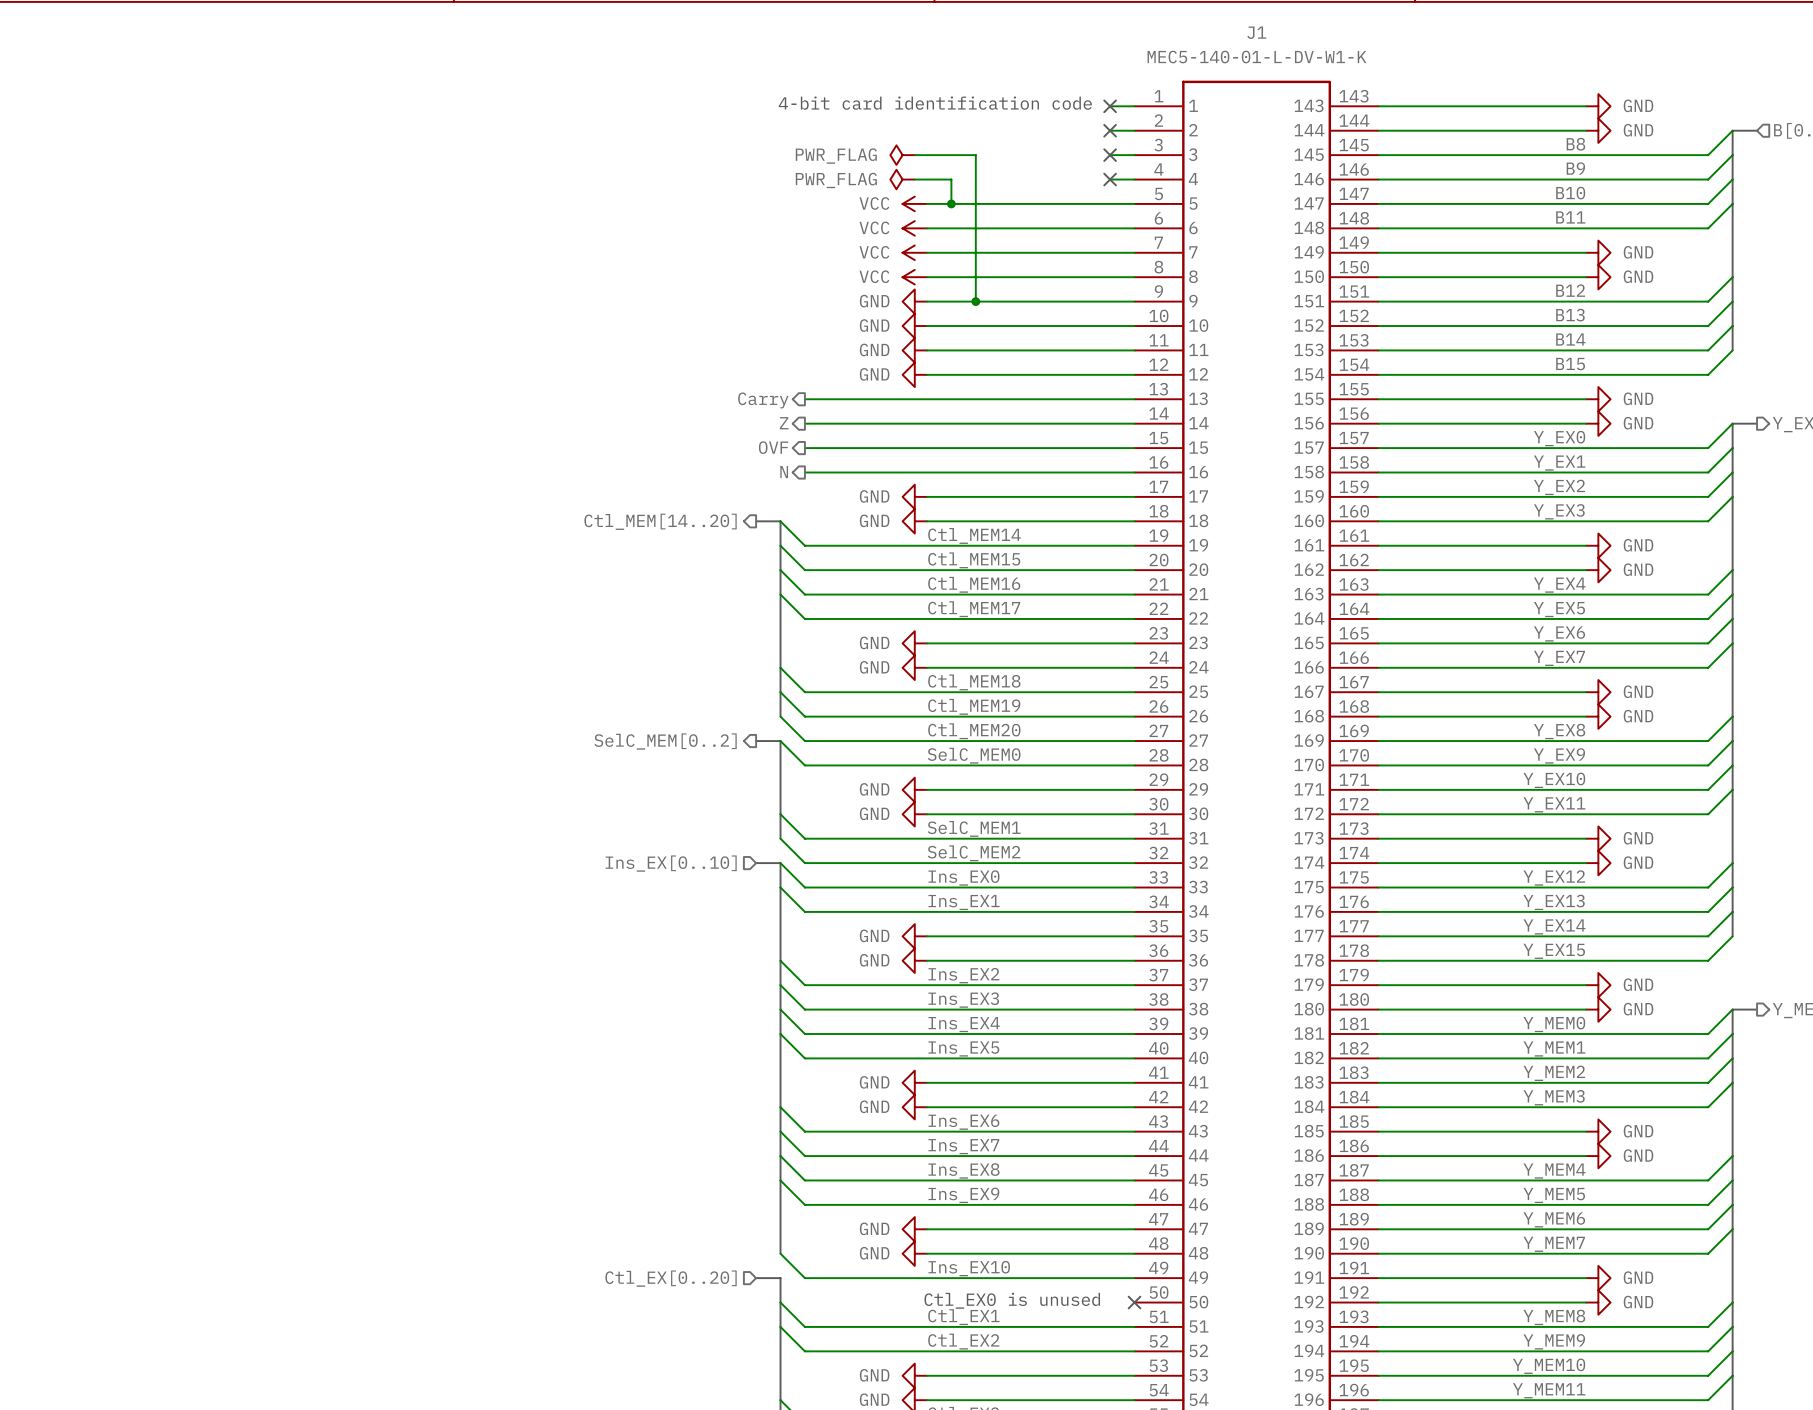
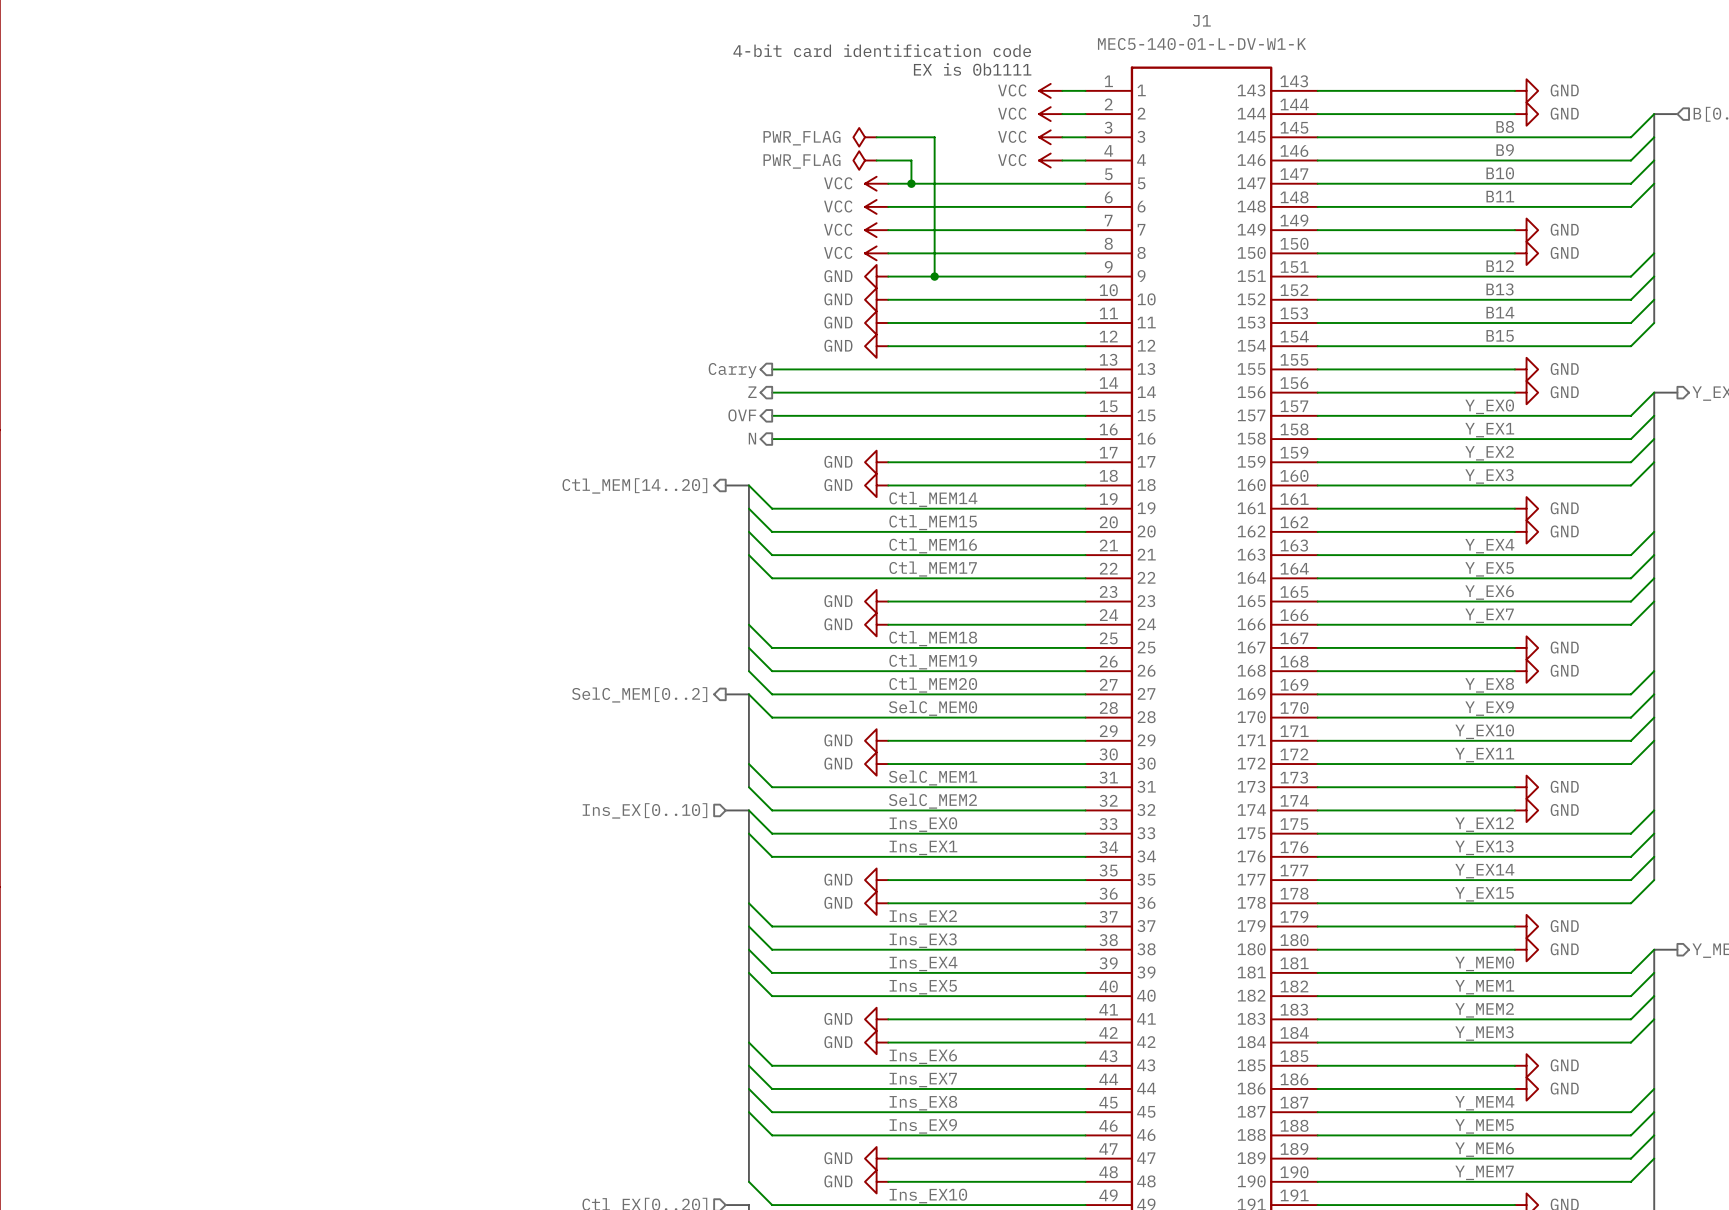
text: none -> EX is 0b1111 (972, 69)
text position: 4-bit card identification code (935, 103) -> 4-bit card identification code (882, 50)
power symbol: none -> VCC (1050, 90)
no-connect mark: (1110, 106) -> none
power symbol: none -> VCC (1050, 114)
no-connect mark: (1110, 130) -> none
power symbol: none -> VCC (1050, 137)
no-connect mark: (1110, 155) -> none
power symbol: none -> VCC (1050, 160)
no-connect mark: (1110, 179) -> none

